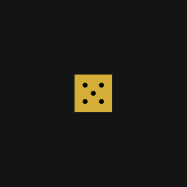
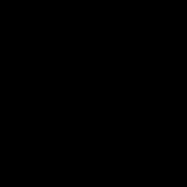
part: (93, 93) -> none

